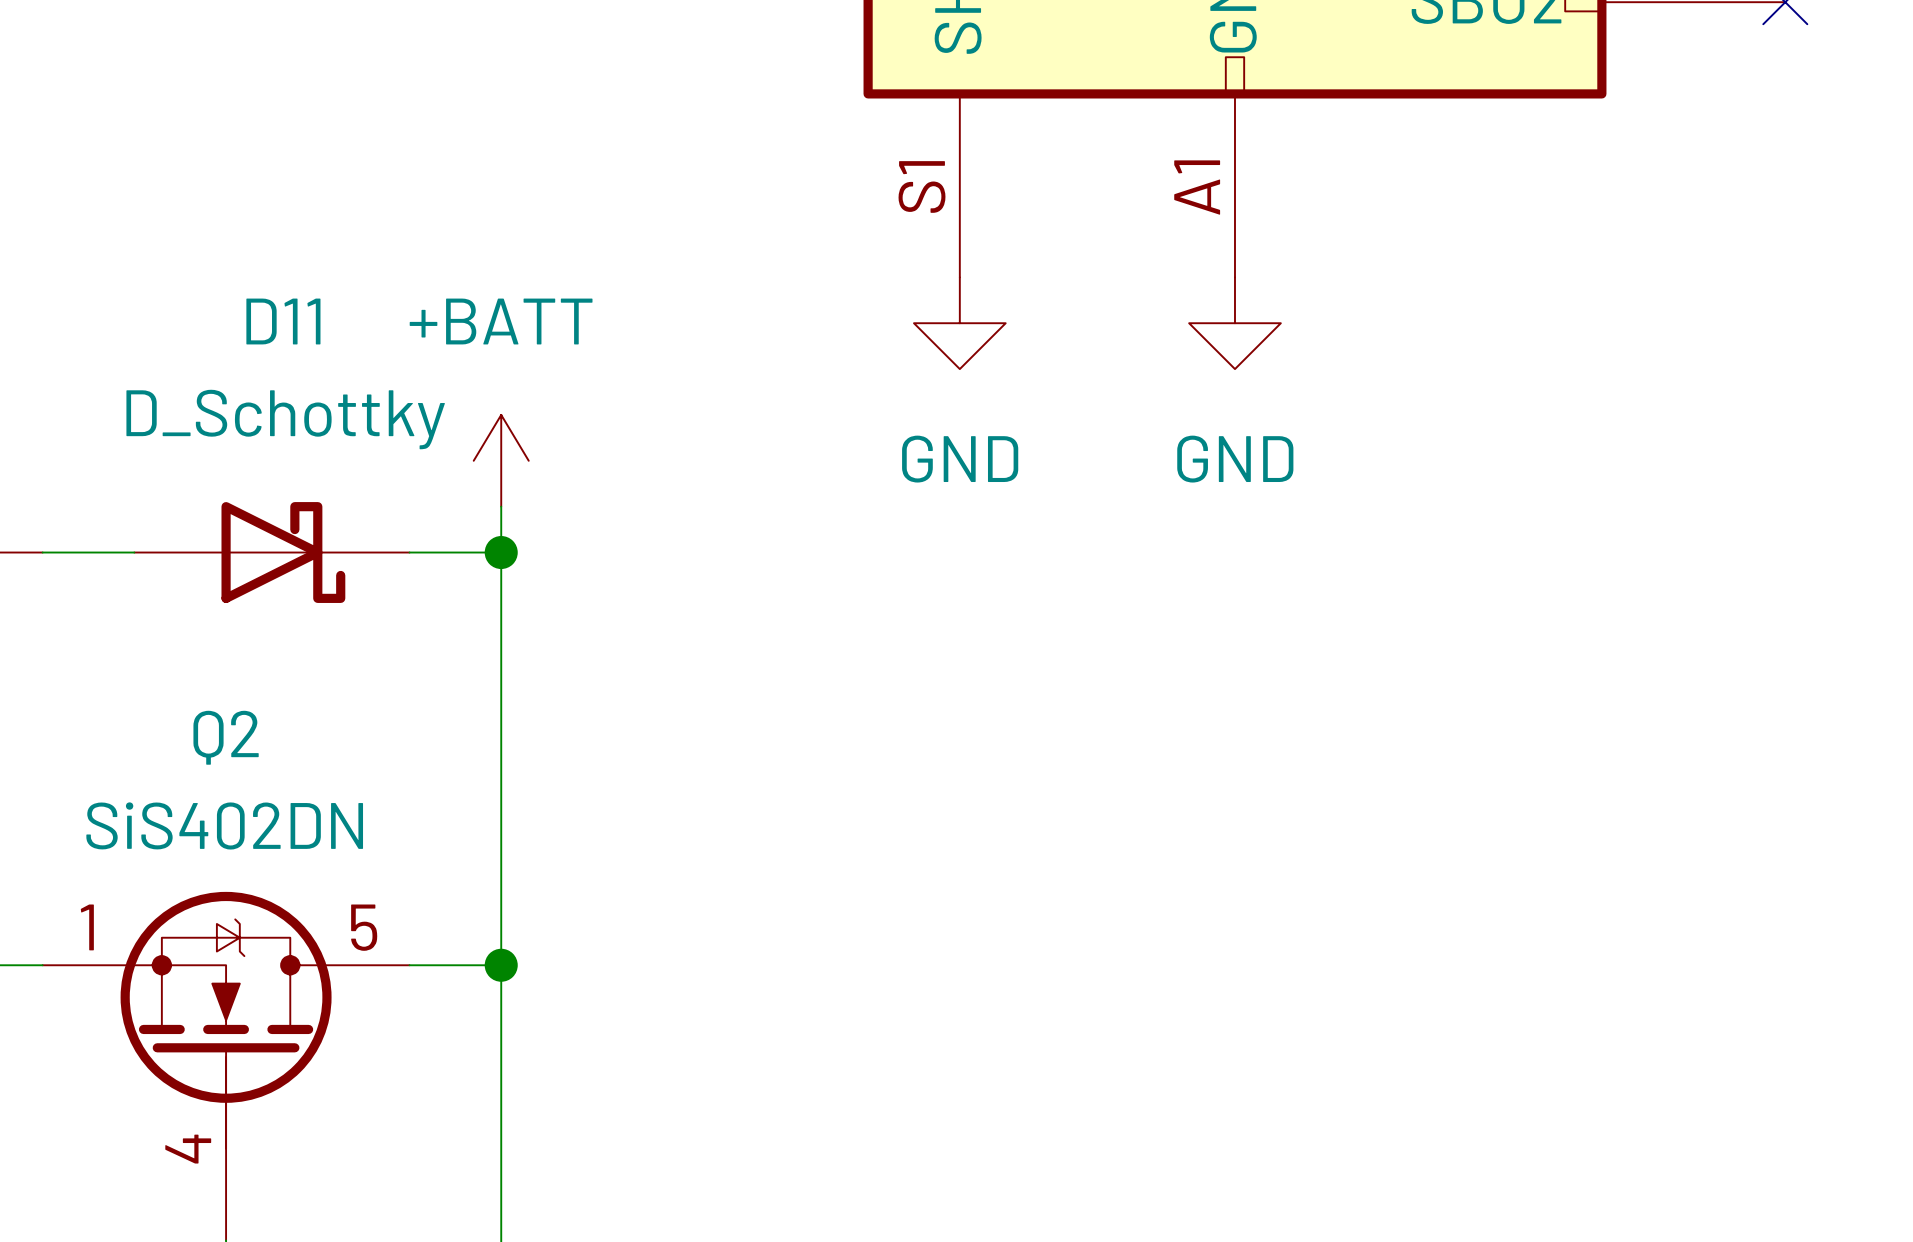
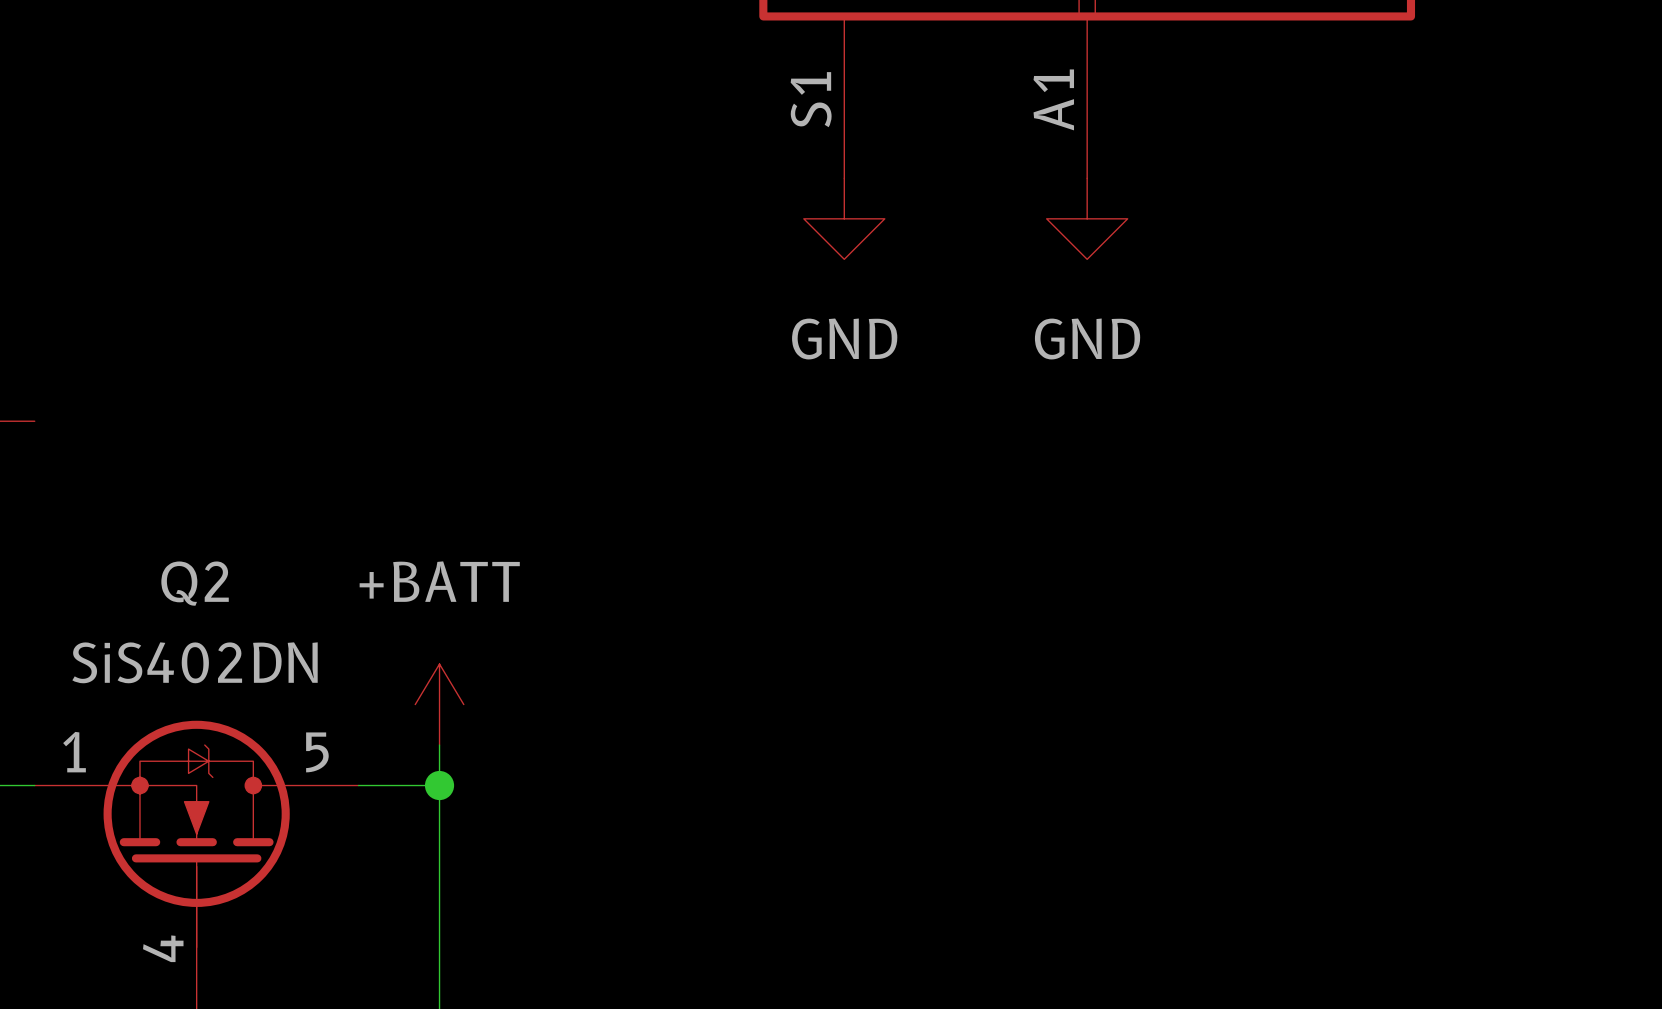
power symbol position: +BATT (501, 460) -> +BATT (439, 704)
wire: (501, 506) (501, 919) -> none
wire: (42, 552) (134, 552) -> none
D11: D_Schottky (271, 552) -> none
wire: (409, 552) (501, 552) -> none
junction: (501, 552) -> none

